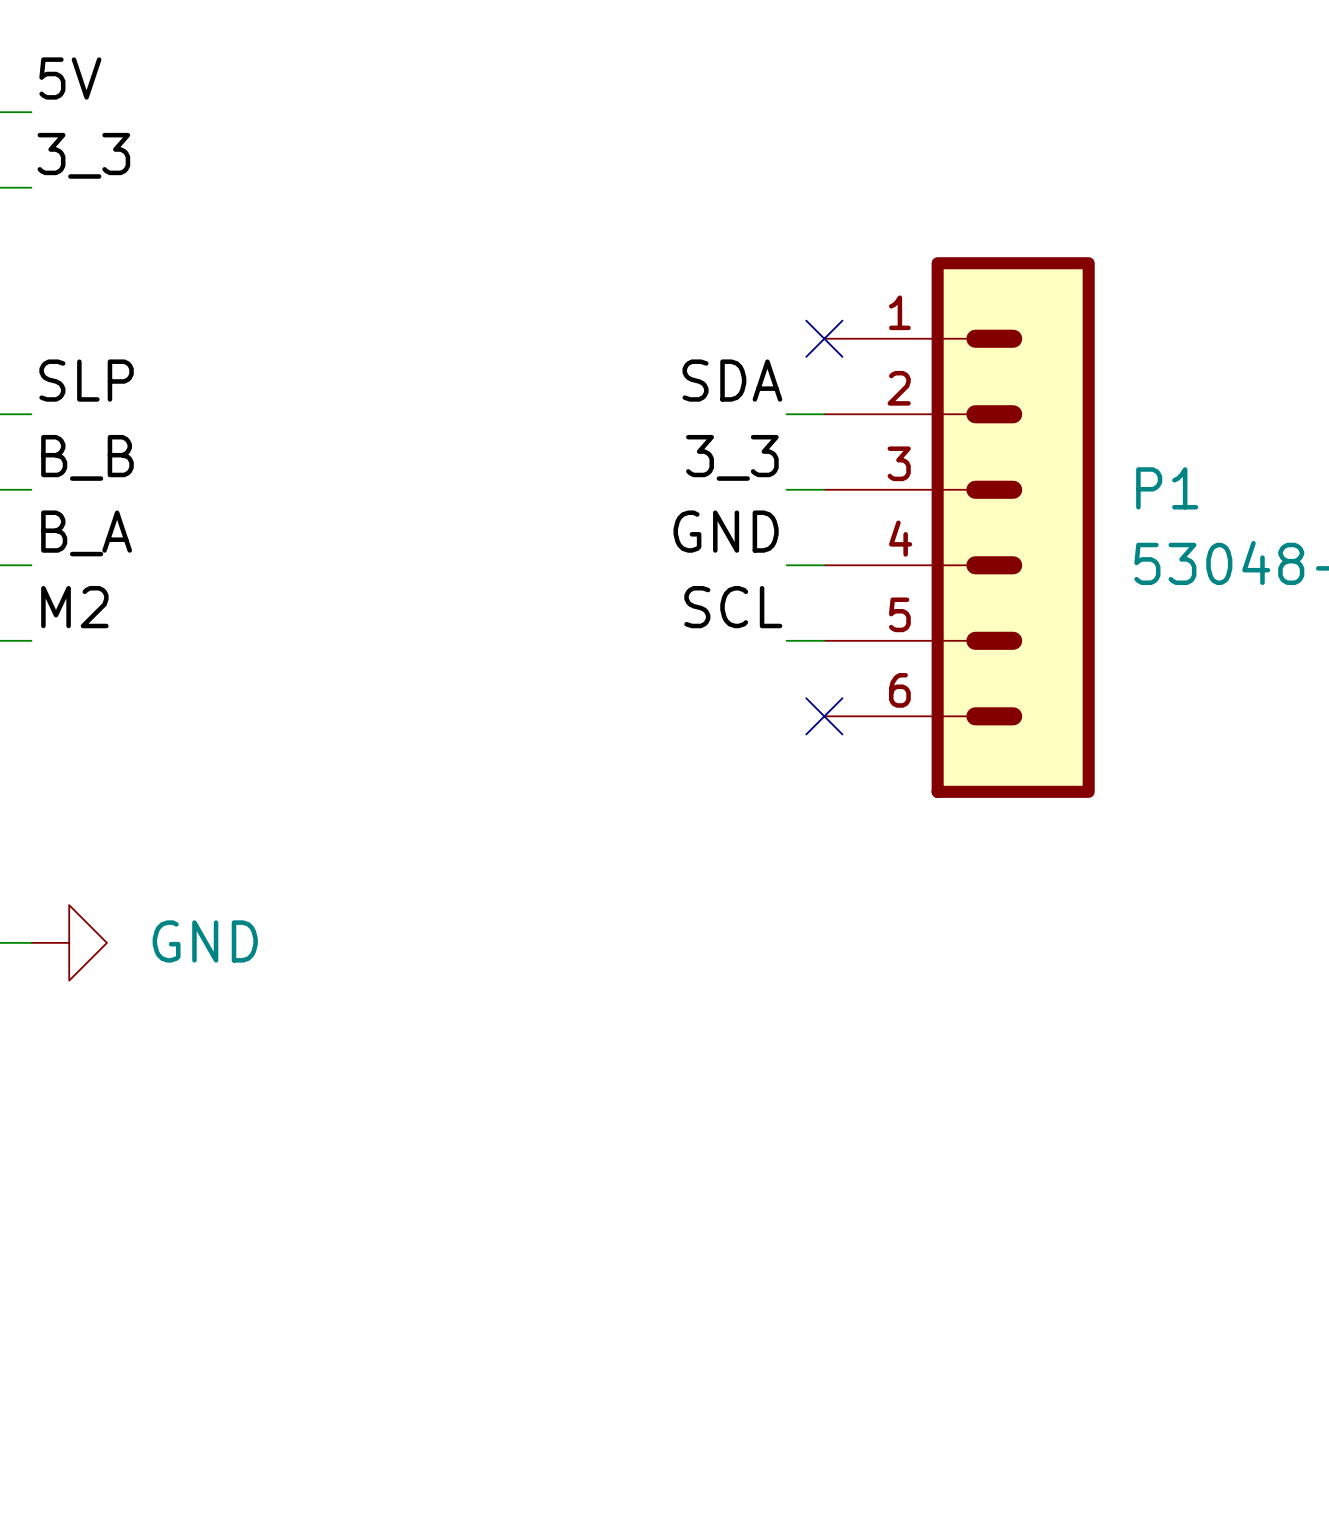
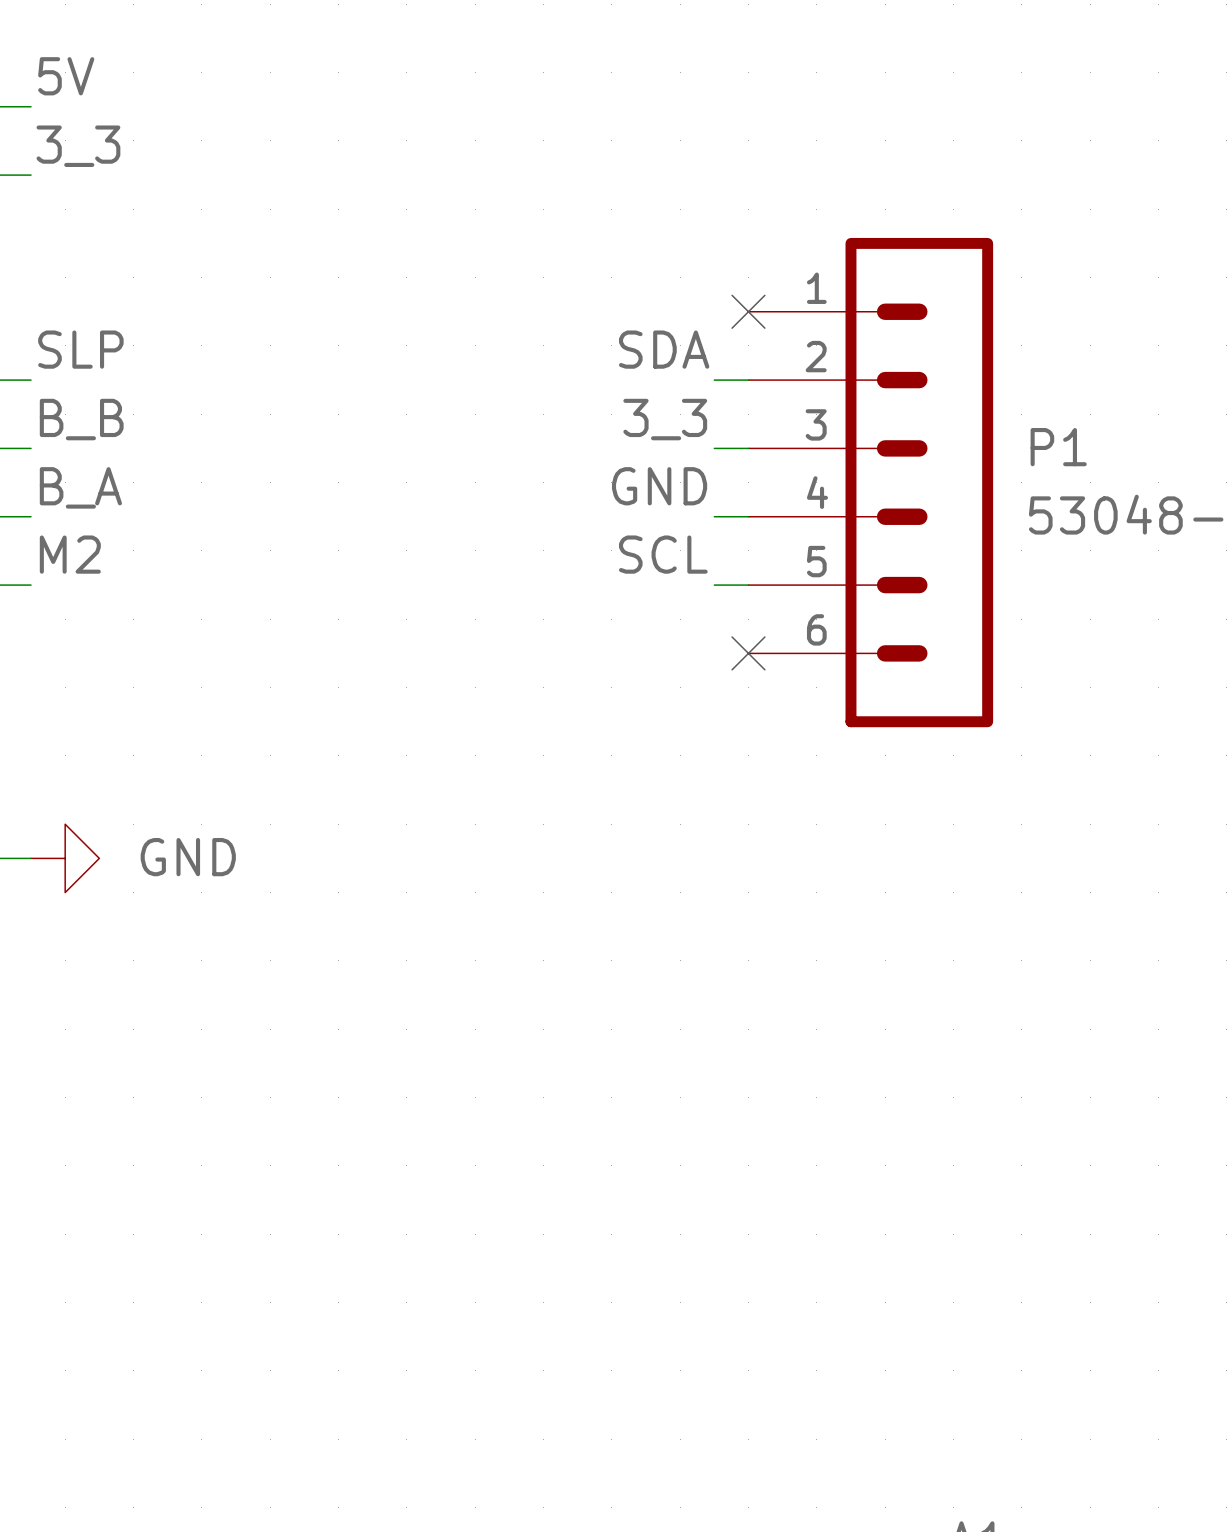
label position: SDA (732, 380) -> SDA (664, 349)
label position: SCL (733, 607) -> SCL (663, 554)

